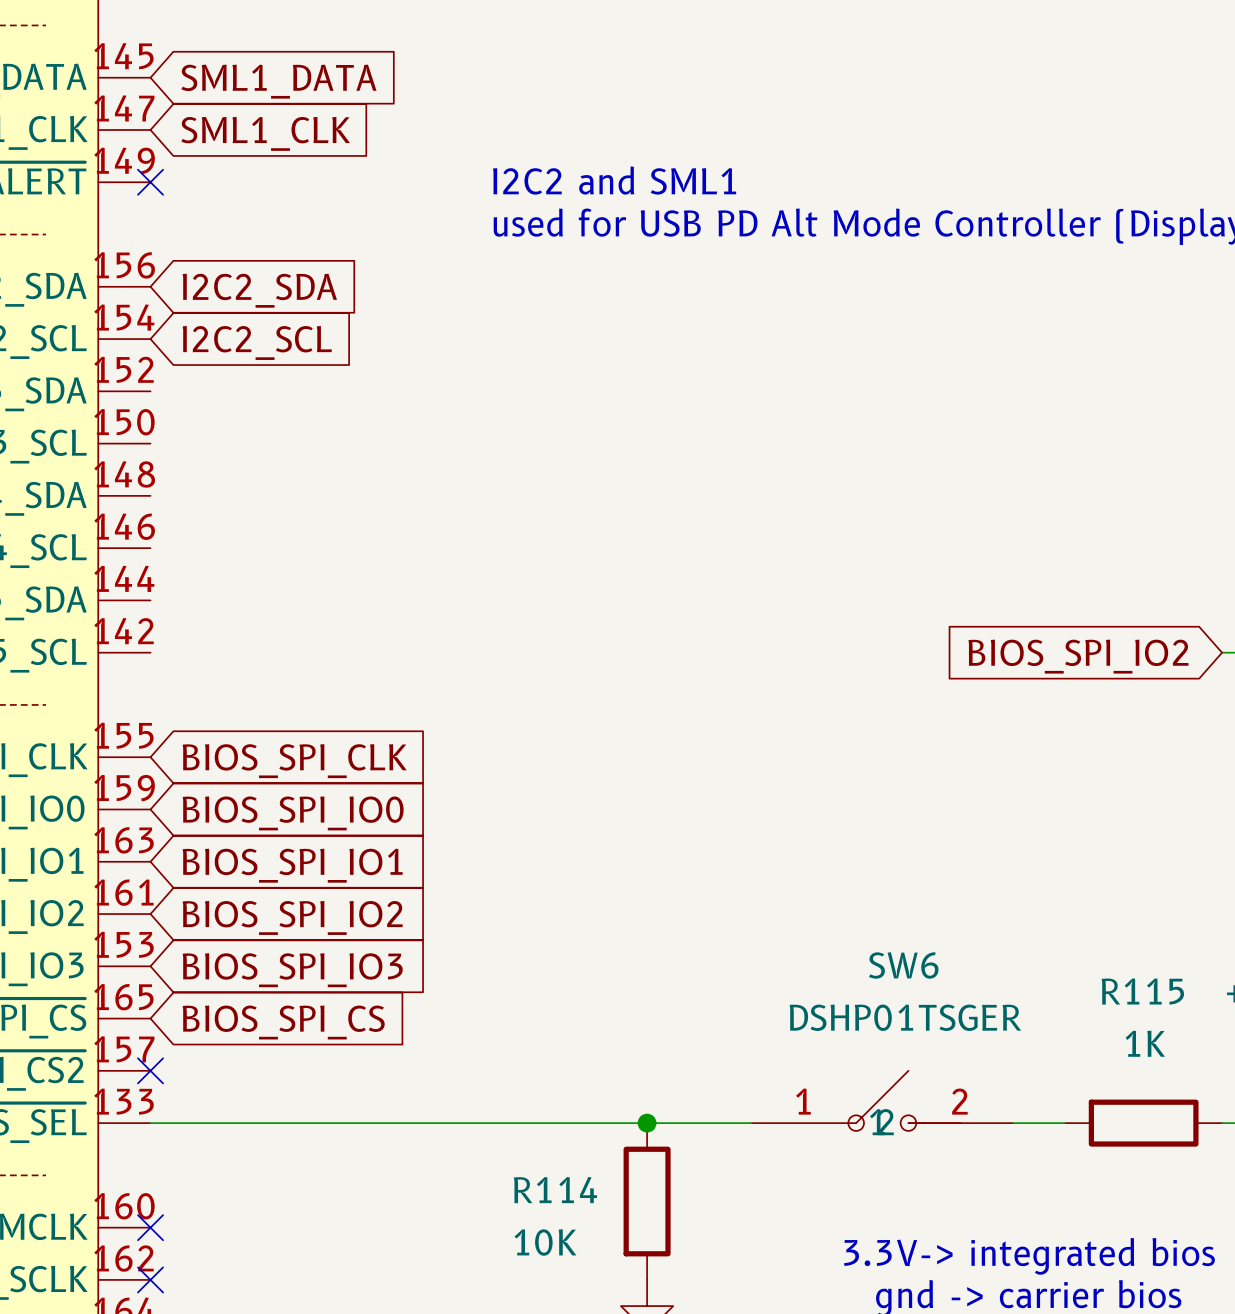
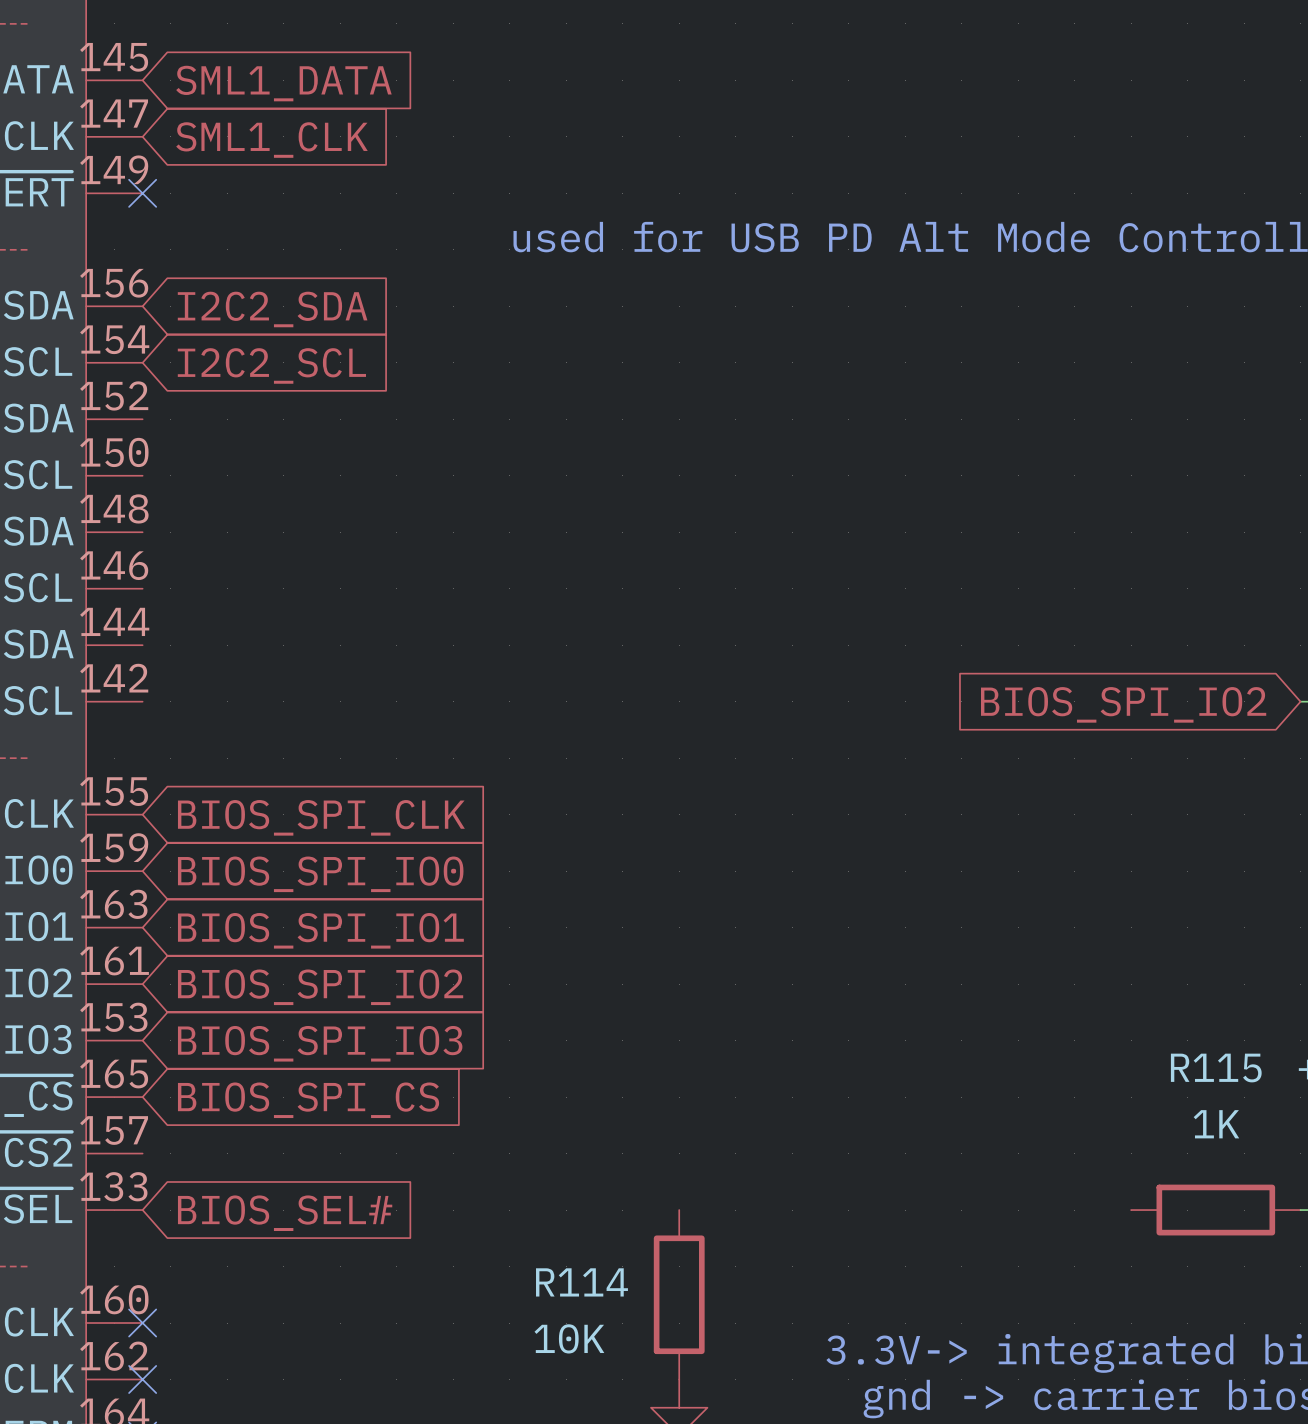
text: I2C2 and SML1 (614, 180) -> none
no-connect mark: (150, 1070) -> none
SW6: DSHP01TSGER (882, 1100) -> none
wire: (150, 1123) (751, 1123) -> none
junction: (647, 1123) -> none
wire: (1012, 1123) (1065, 1123) -> none
global label: none -> BIOS_SEL# (285, 1213)

